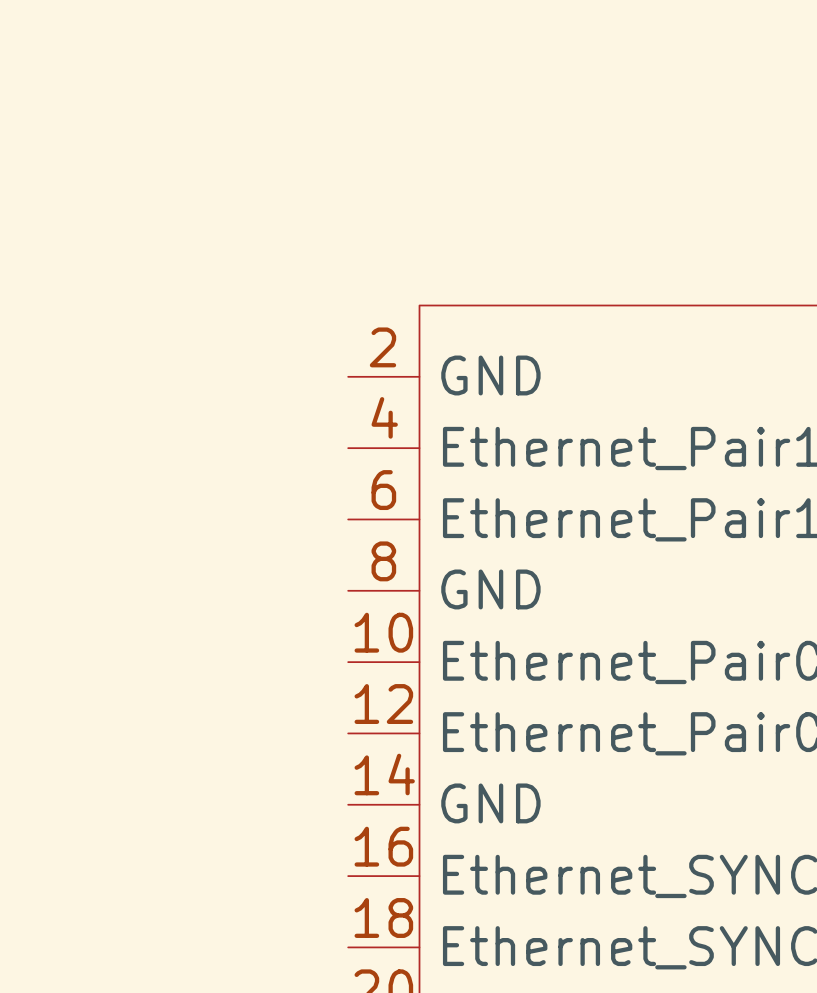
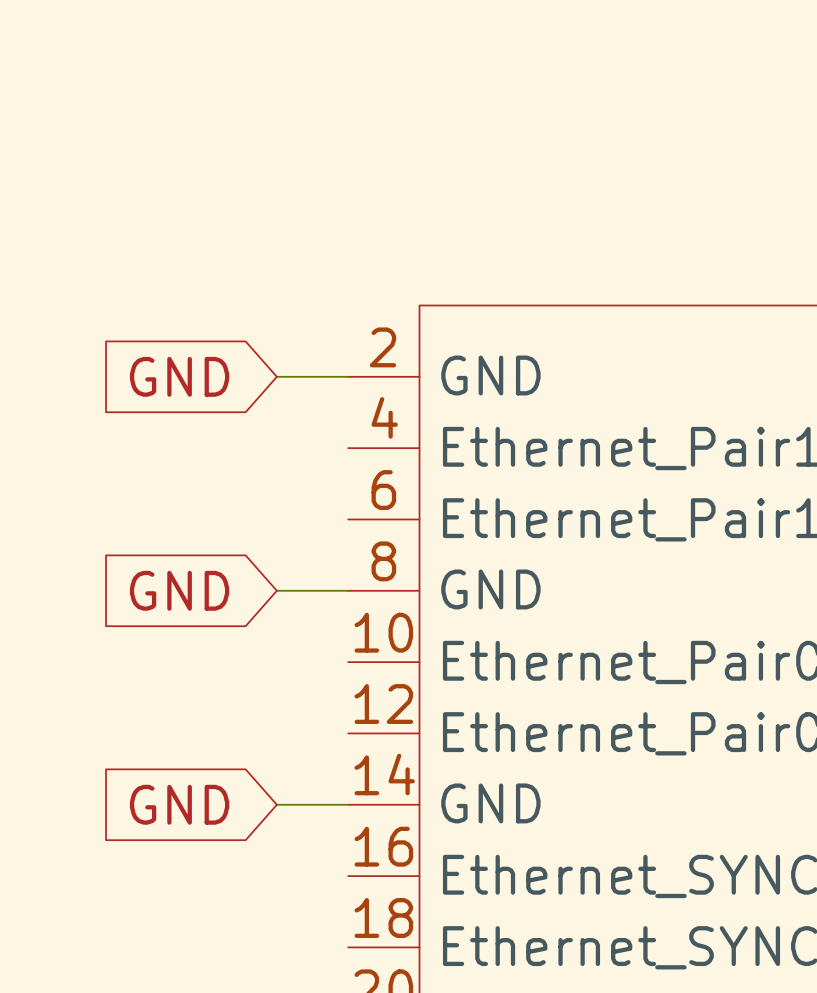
global label: none -> GND (179, 376)
wire: none -> (276, 376) (348, 376)
global label: none -> GND (179, 590)
wire: none -> (276, 590) (348, 590)
global label: none -> GND (179, 804)
wire: none -> (276, 804) (348, 804)

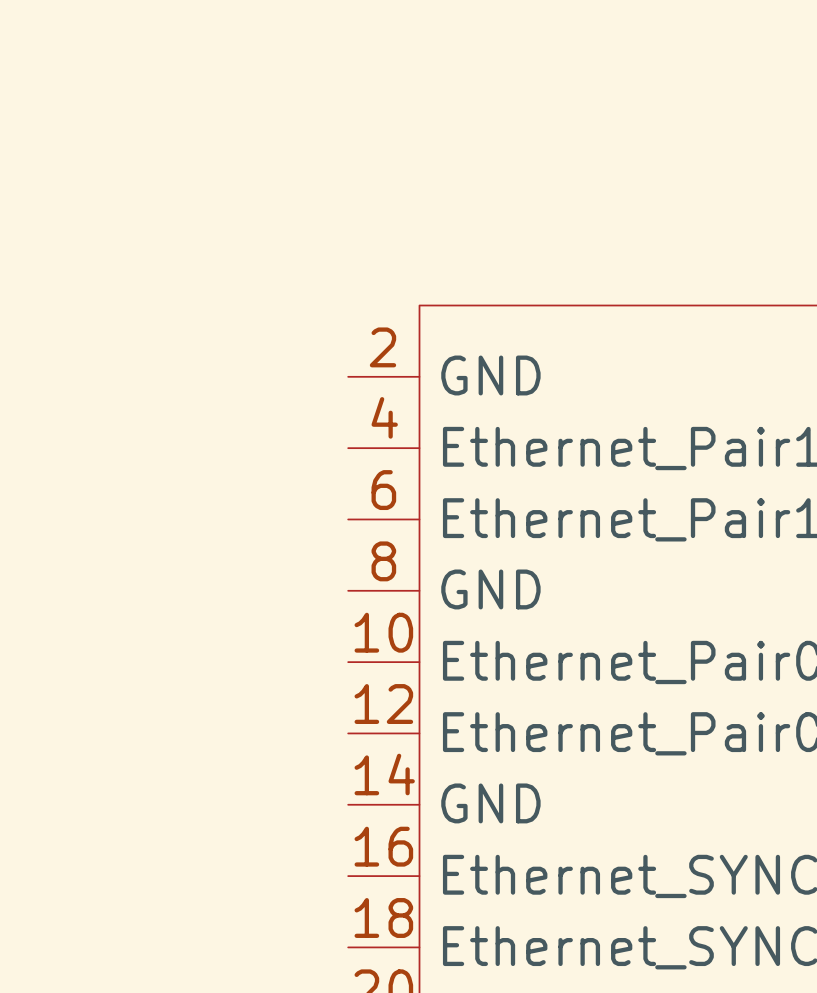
global label: GND (179, 376) -> none
wire: (276, 376) (348, 376) -> none
global label: GND (179, 590) -> none
wire: (276, 590) (348, 590) -> none
global label: GND (179, 804) -> none
wire: (276, 804) (348, 804) -> none

